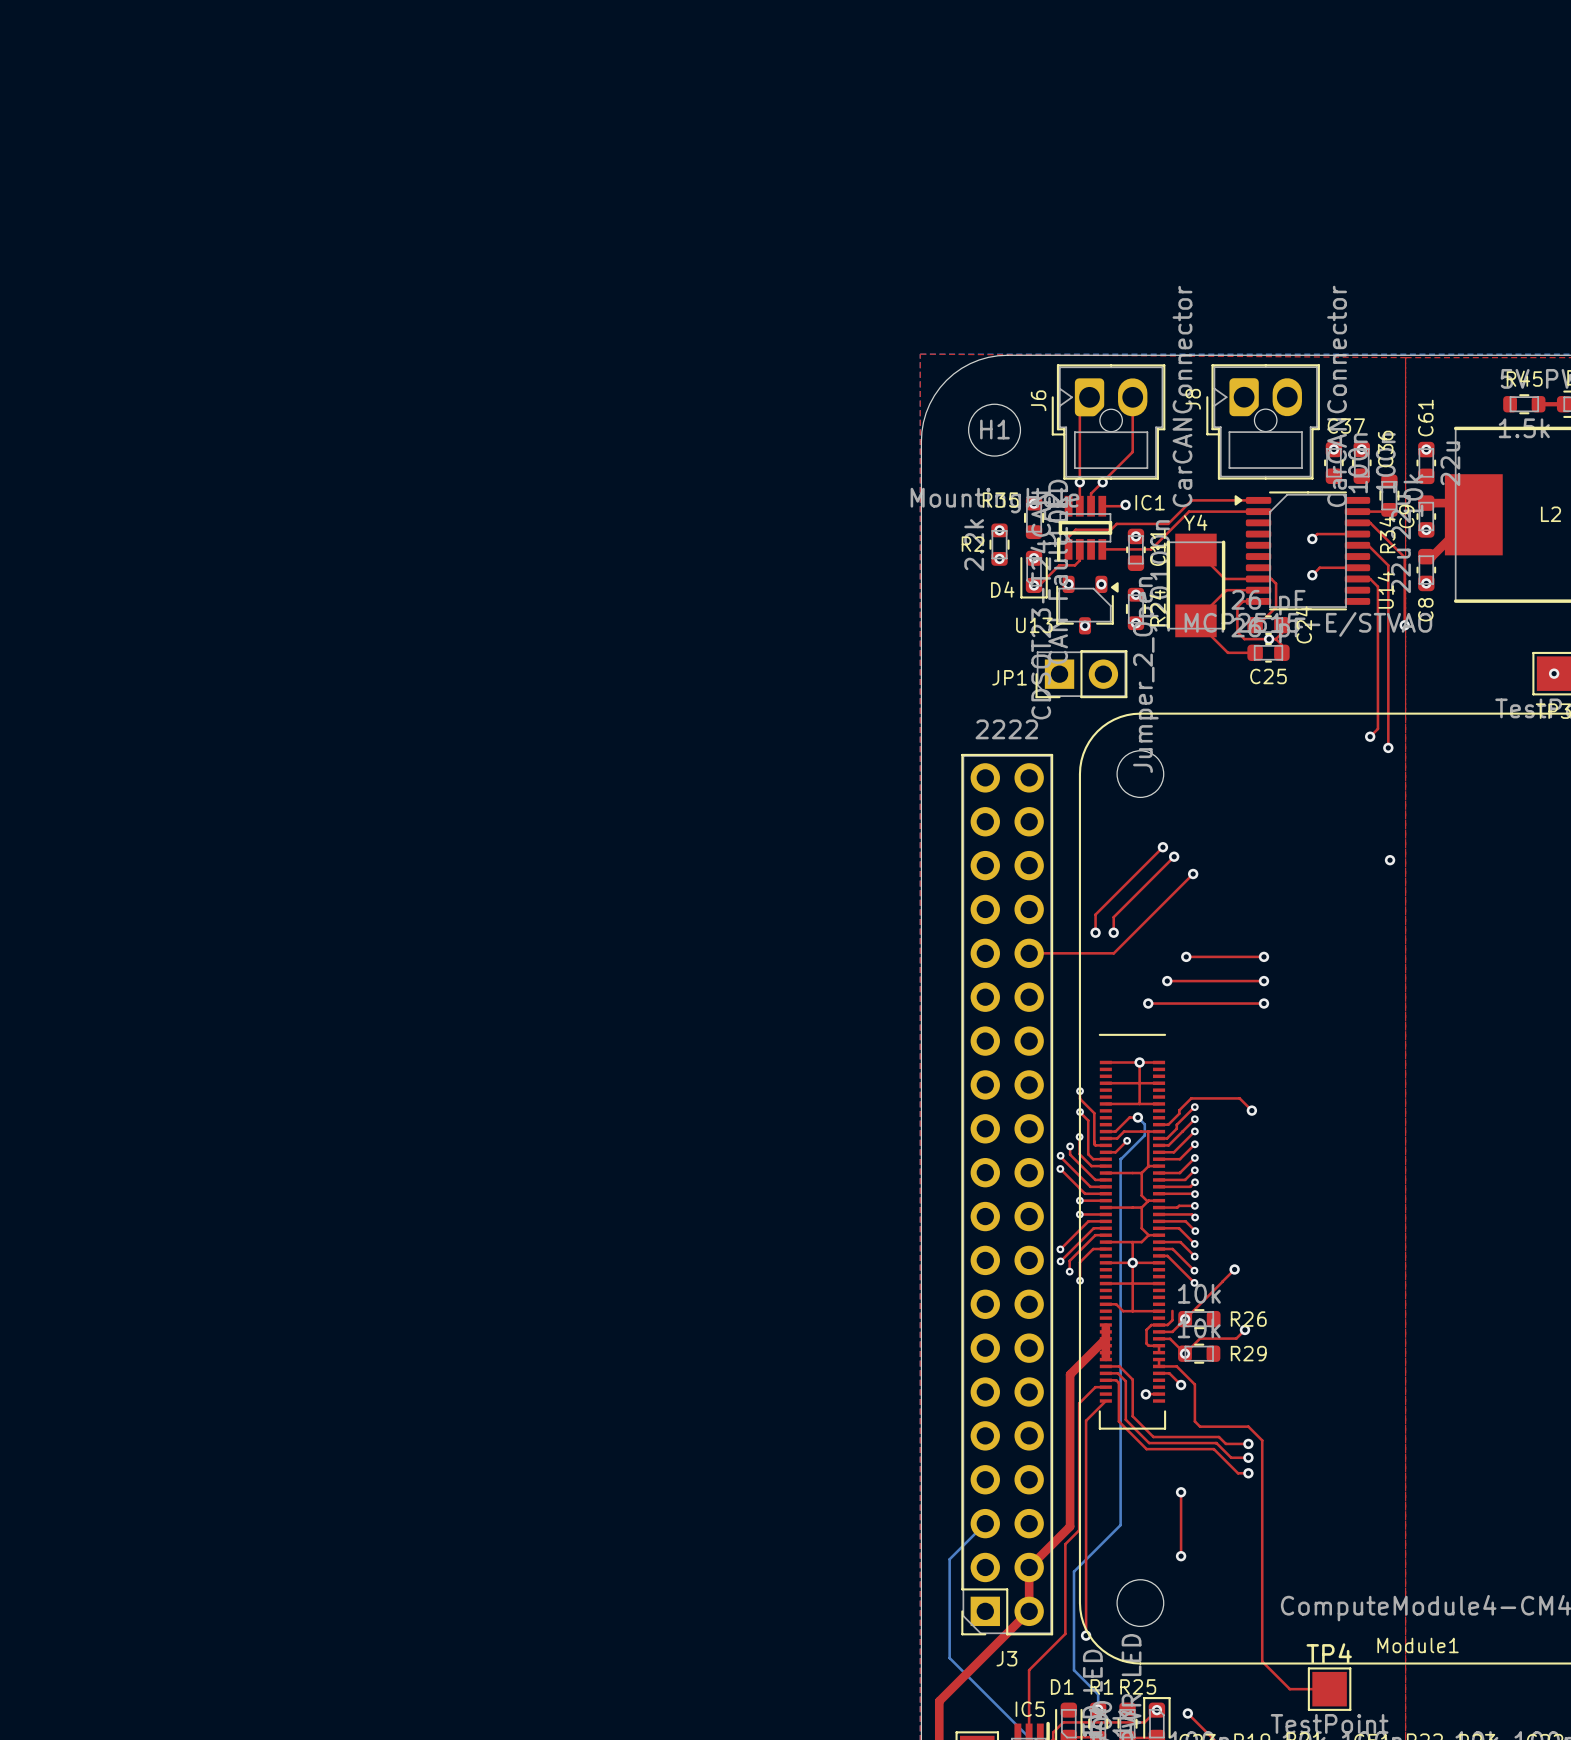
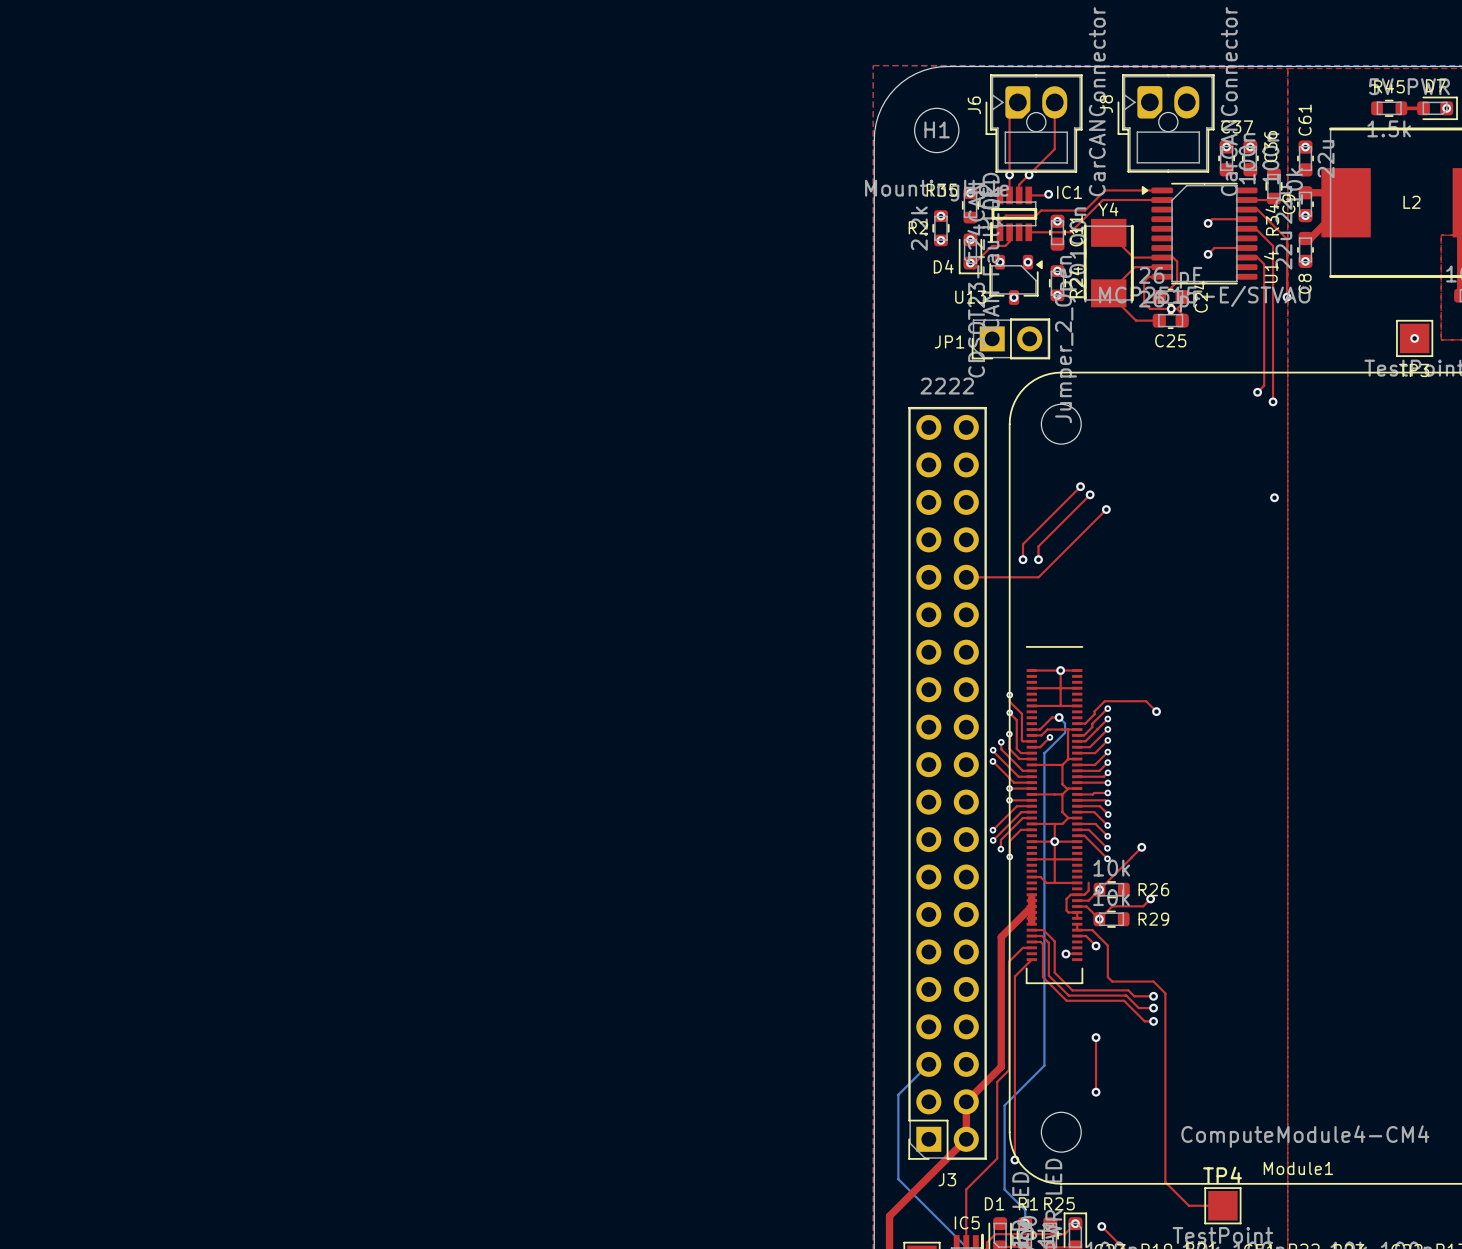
top track: (1186, 956) (1263, 956) -> none
via: (1186, 956) -> none
via: (1263, 956) -> none
top track: (1167, 981) (1263, 981) -> none
via: (1167, 981) -> none
via: (1263, 981) -> none
top track: (1148, 1003) (1263, 1003) -> none
via: (1148, 1003) -> none
via: (1263, 1003) -> none

